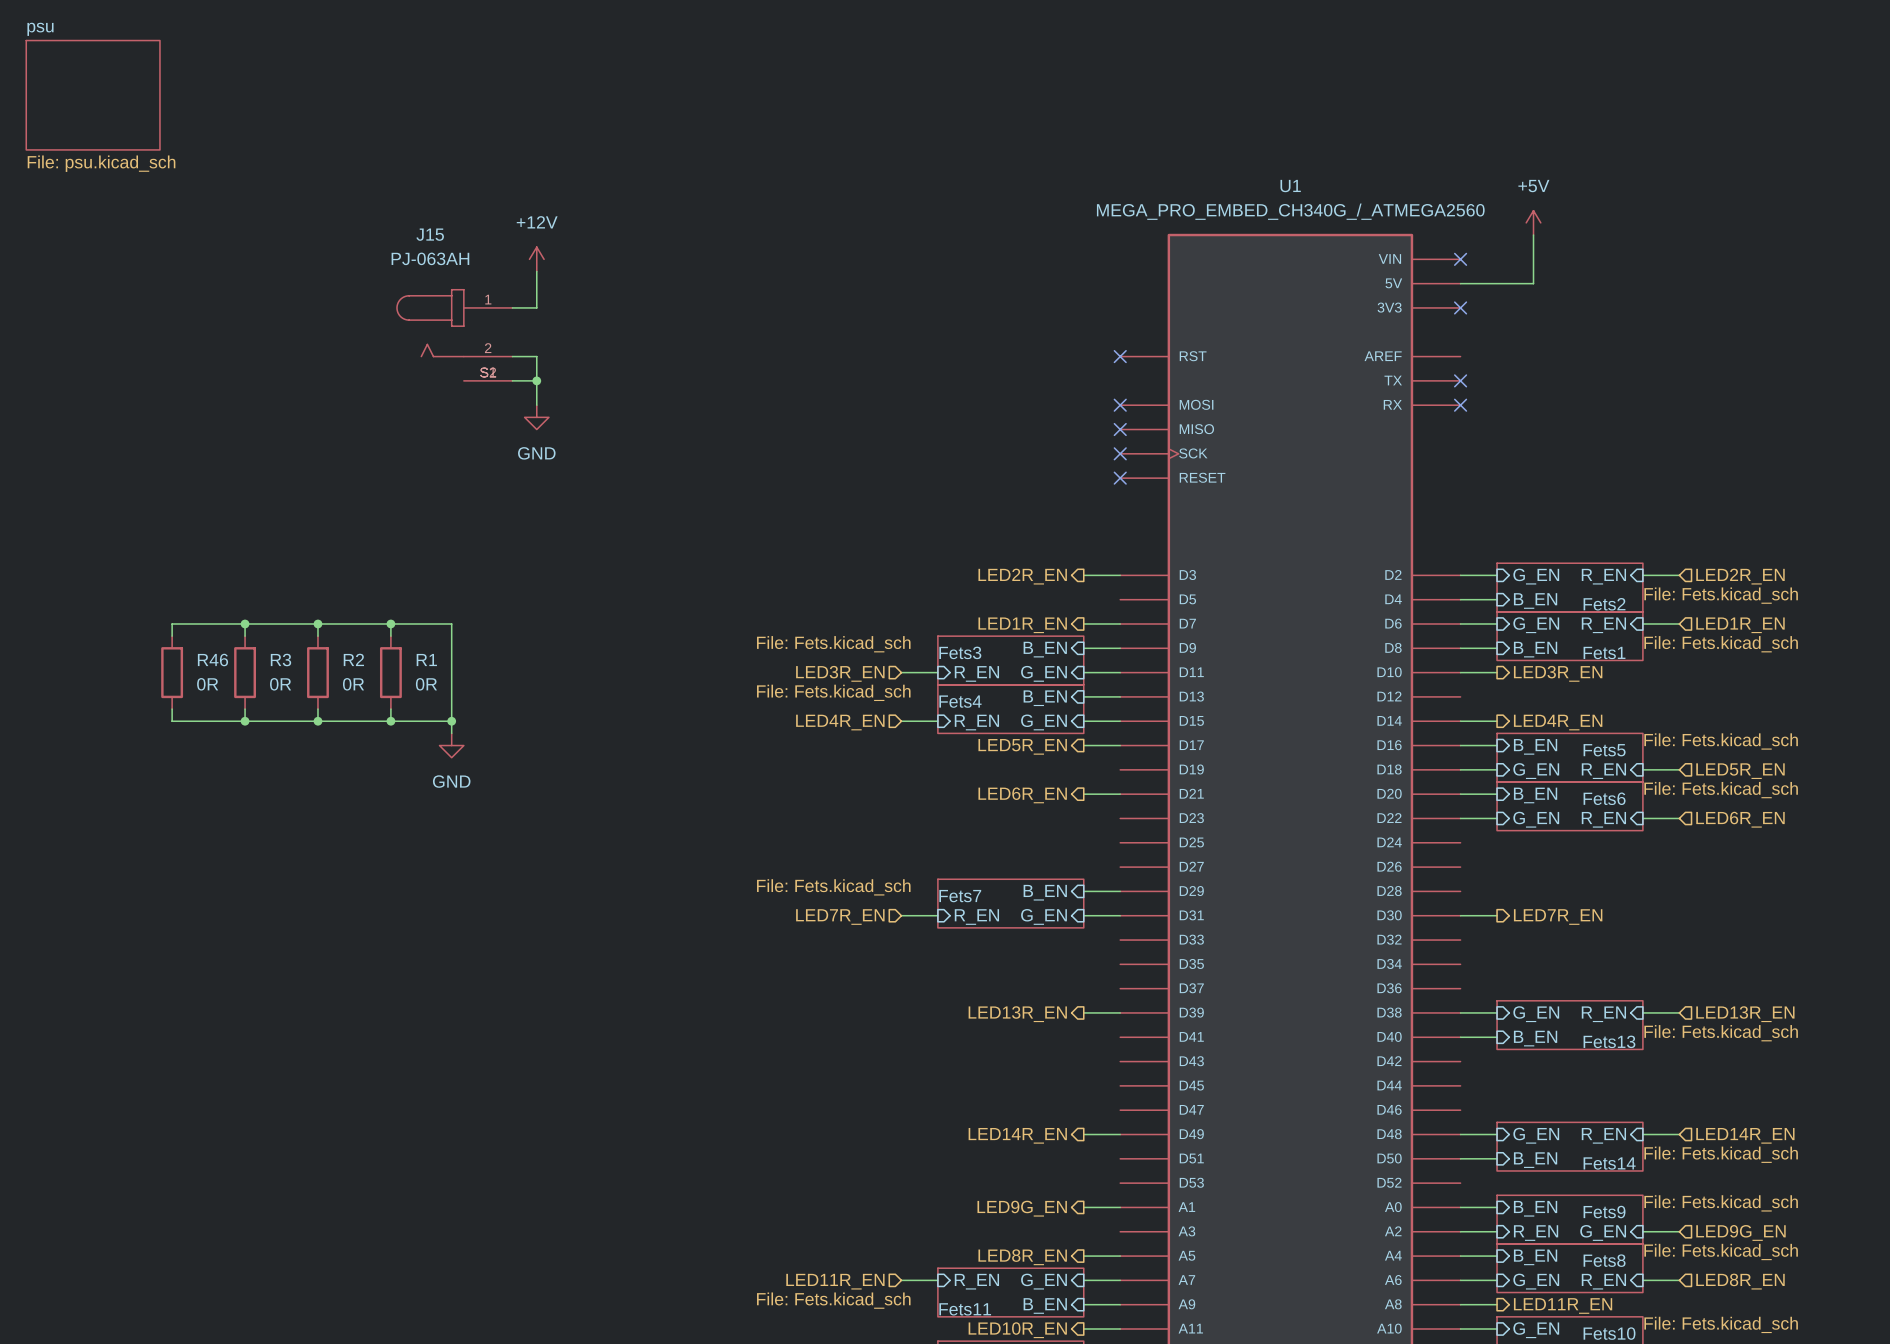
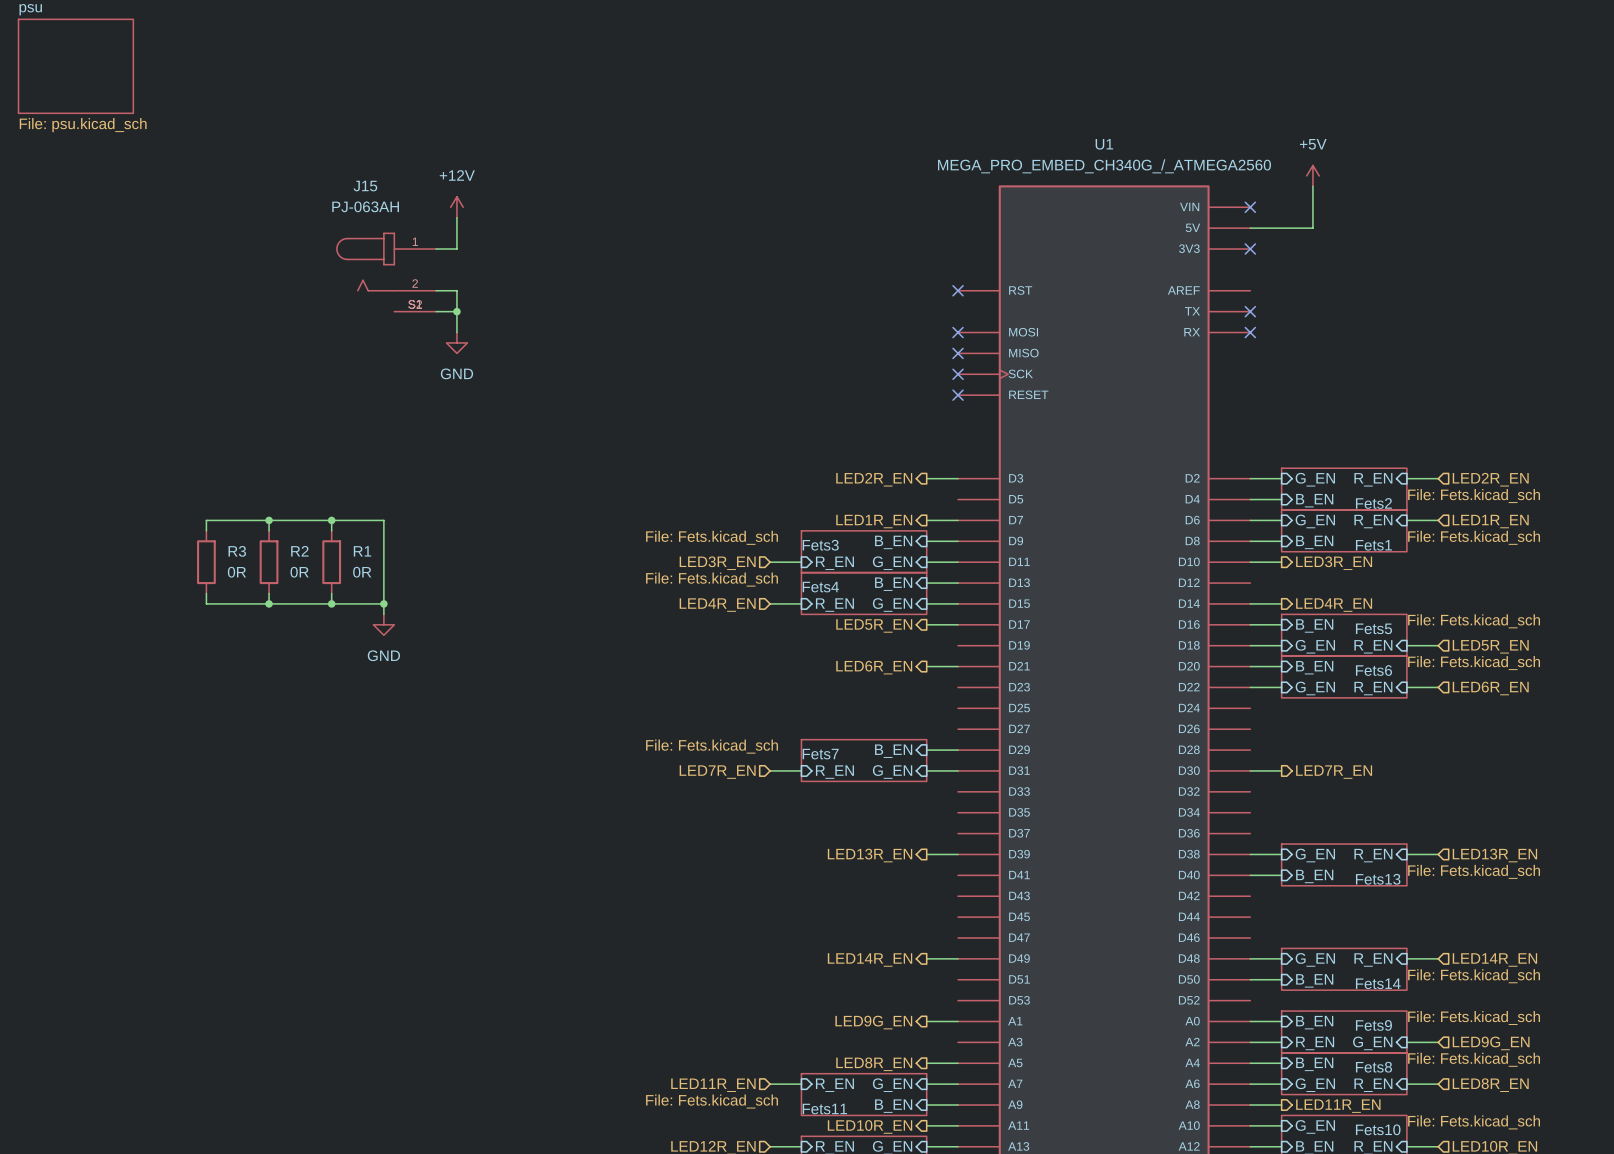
wire: (245, 623) (172, 623) (172, 636) -> none
junction: (245, 623) -> none
R46: 0R (172, 672) -> none
wire: (172, 709) (172, 721) (245, 721) -> none
junction: (245, 721) -> none

